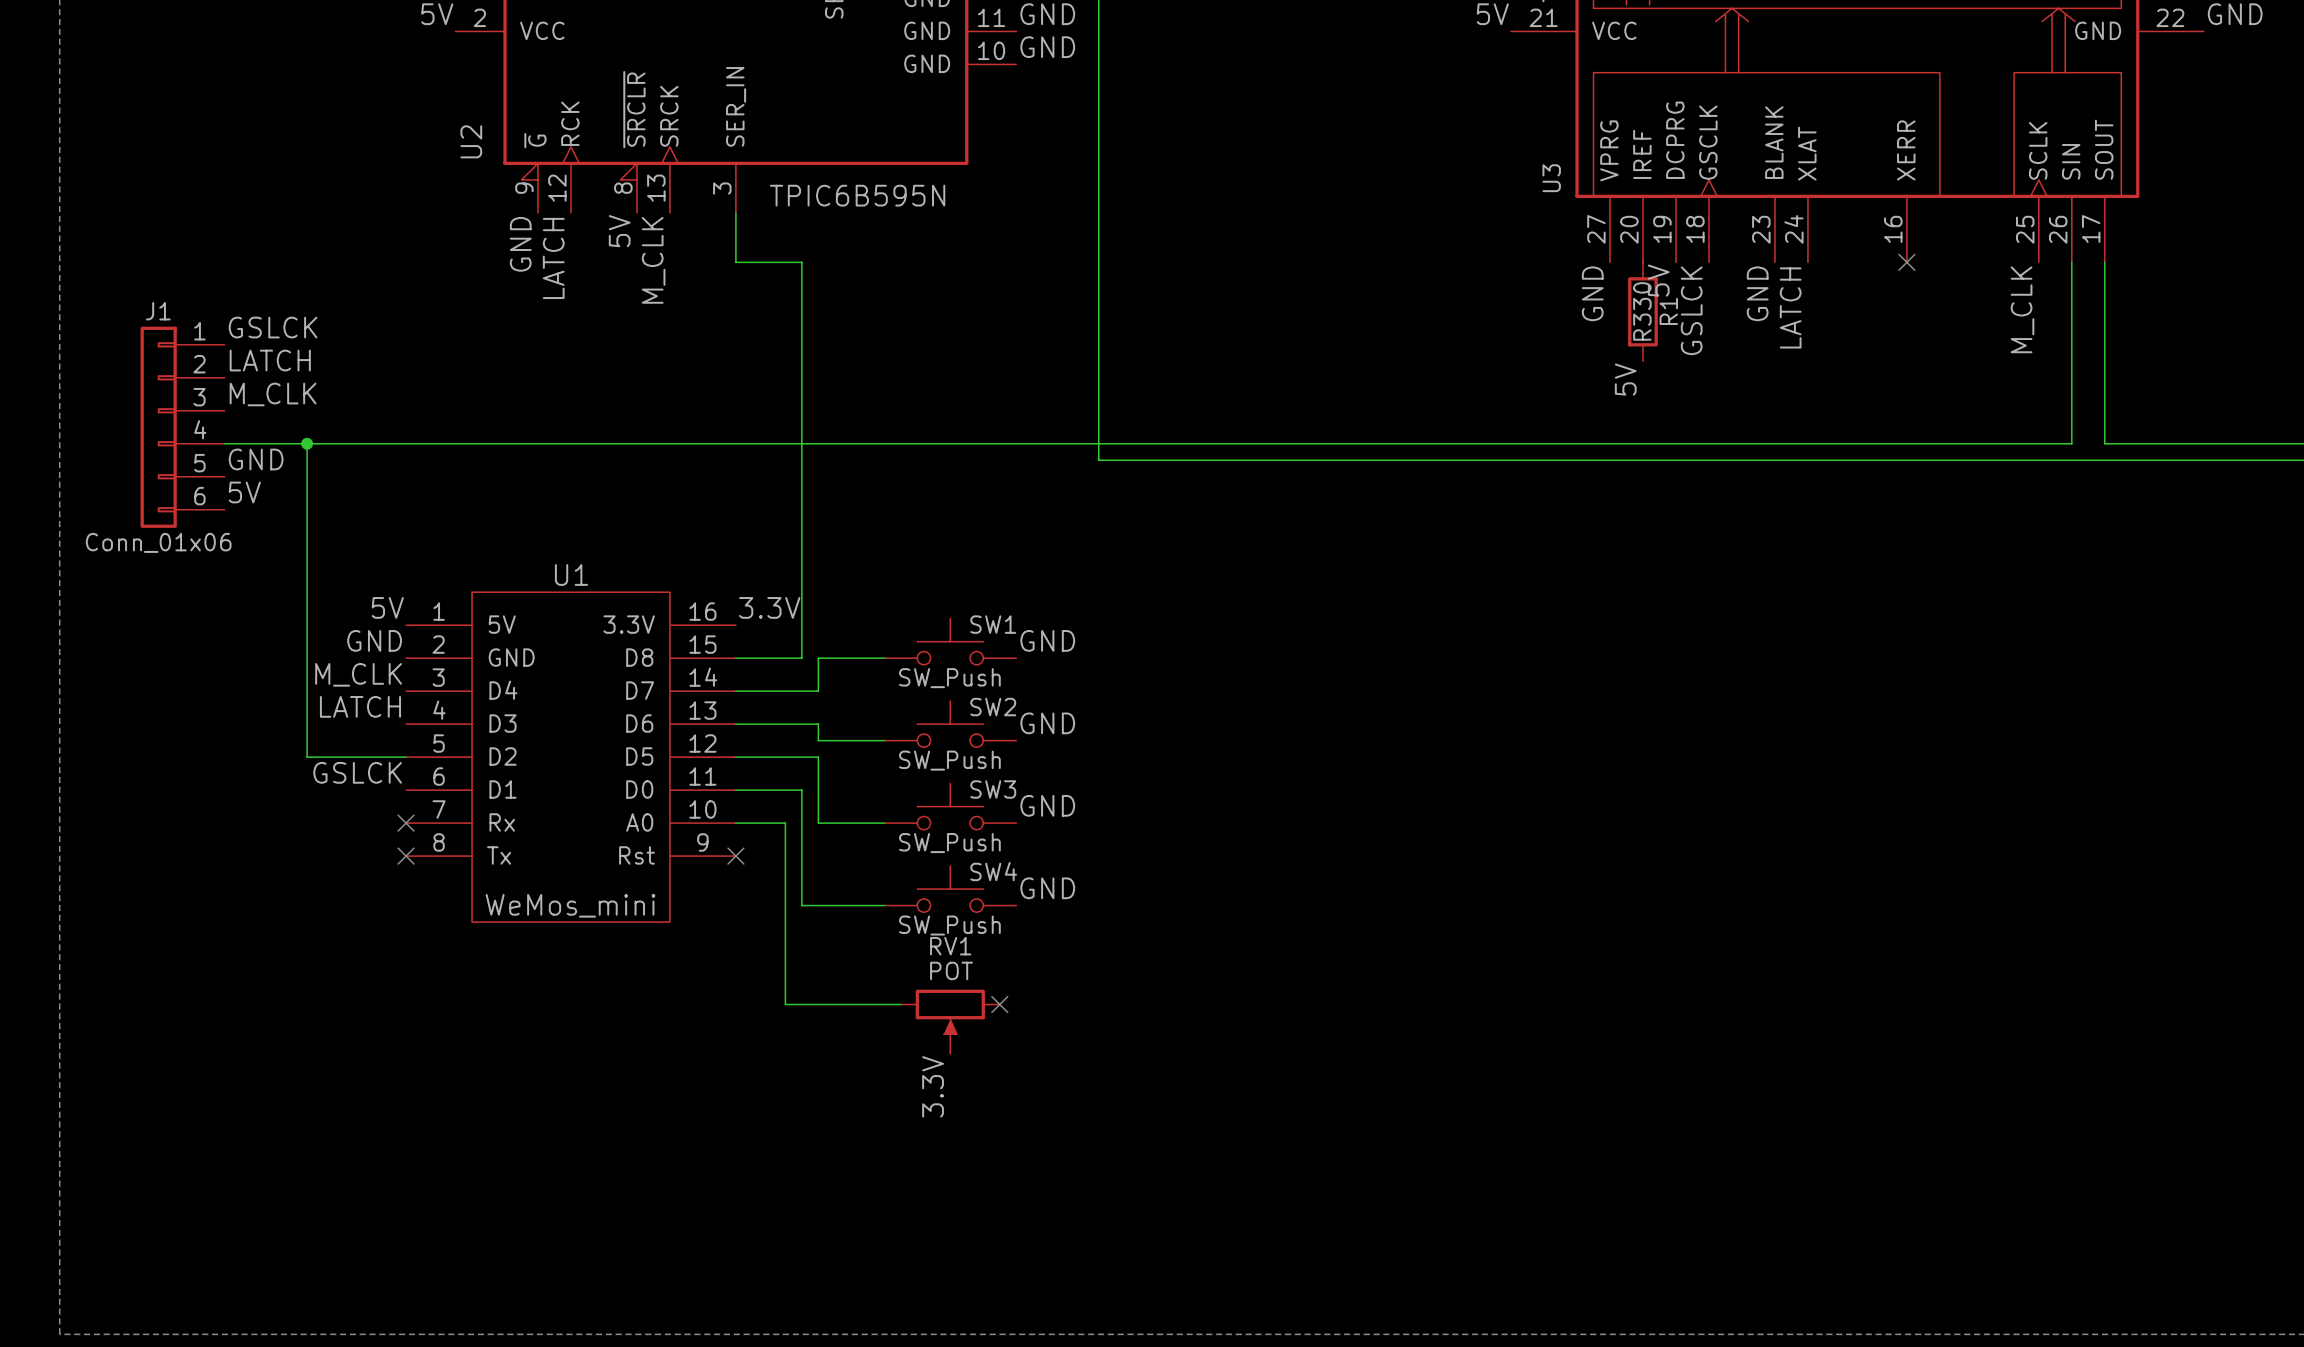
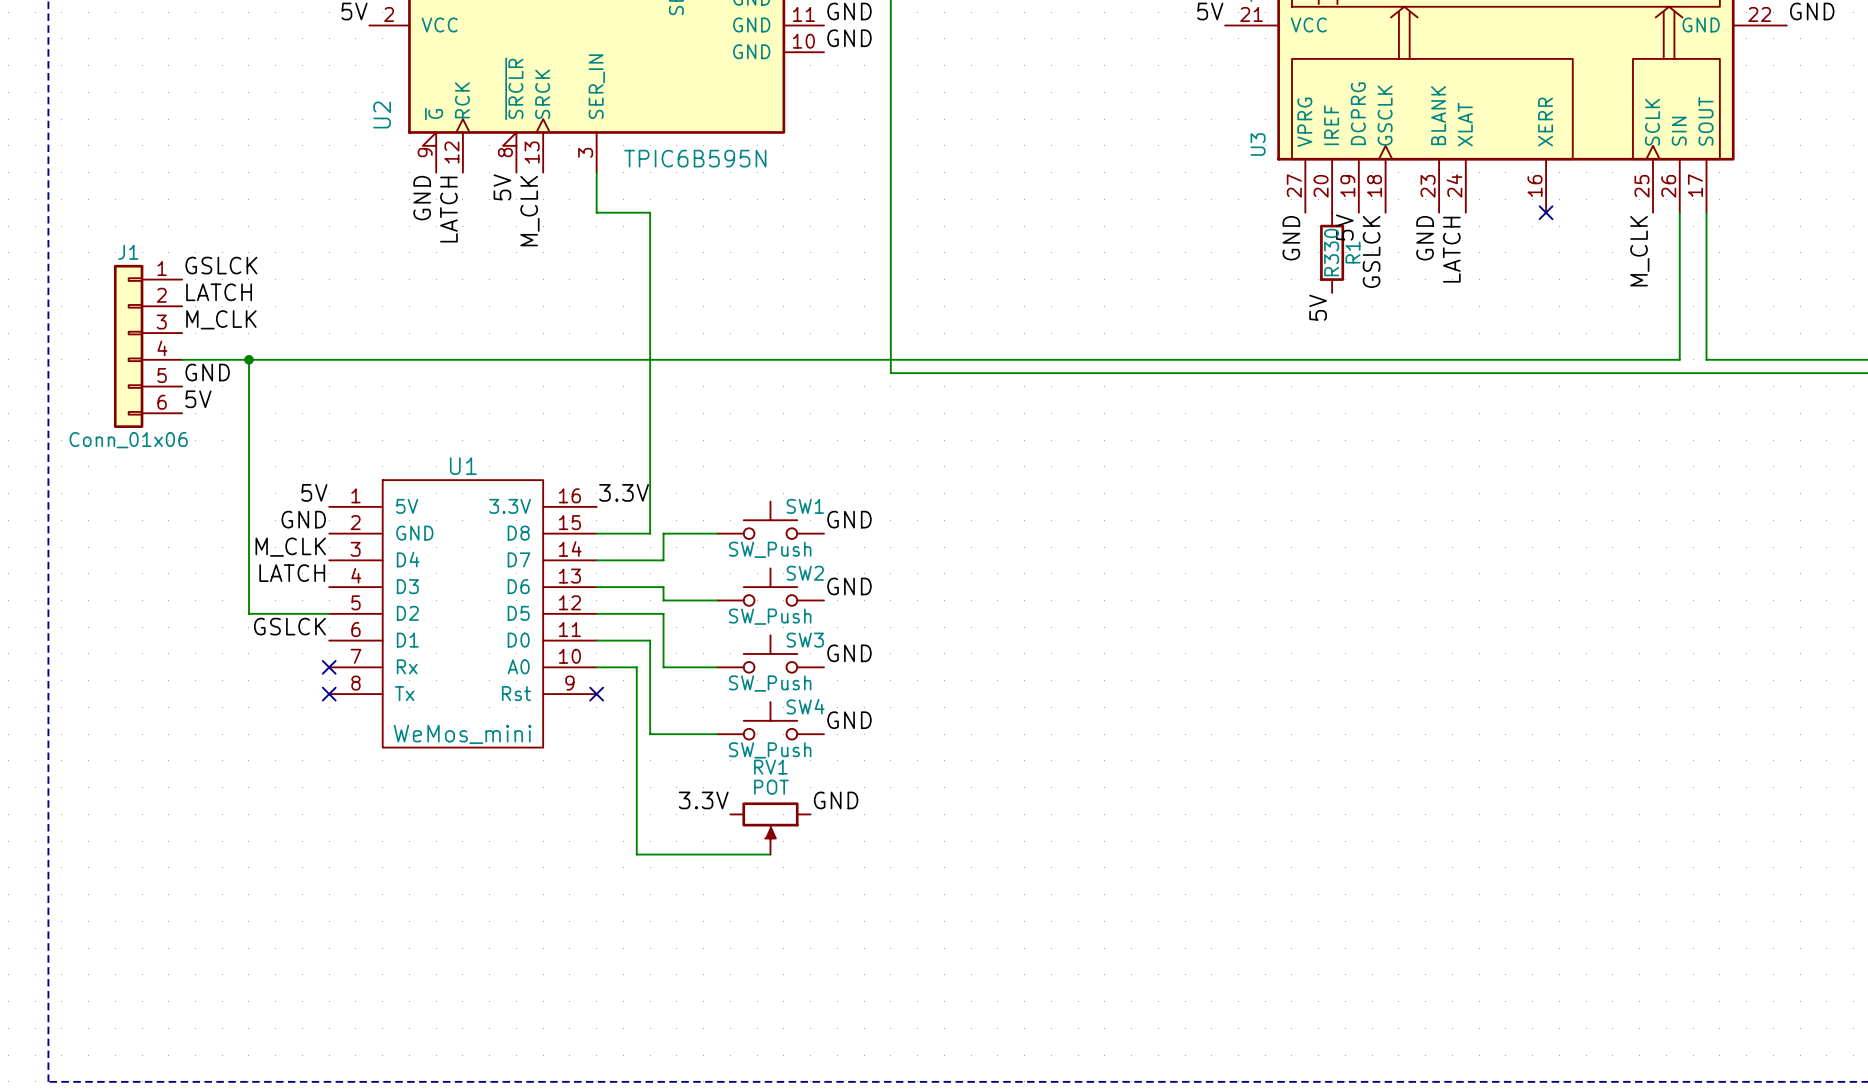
label: none -> GND (836, 800)
wire: (785, 1004) (900, 1004) -> (636, 814) (636, 854) (770, 854)
no-connect mark: (999, 1004) -> none
label rotation: 0° (933, 1086) -> 90° clockwise (703, 800)
label position: 3.3V (933, 1086) -> 3.3V (703, 800)

